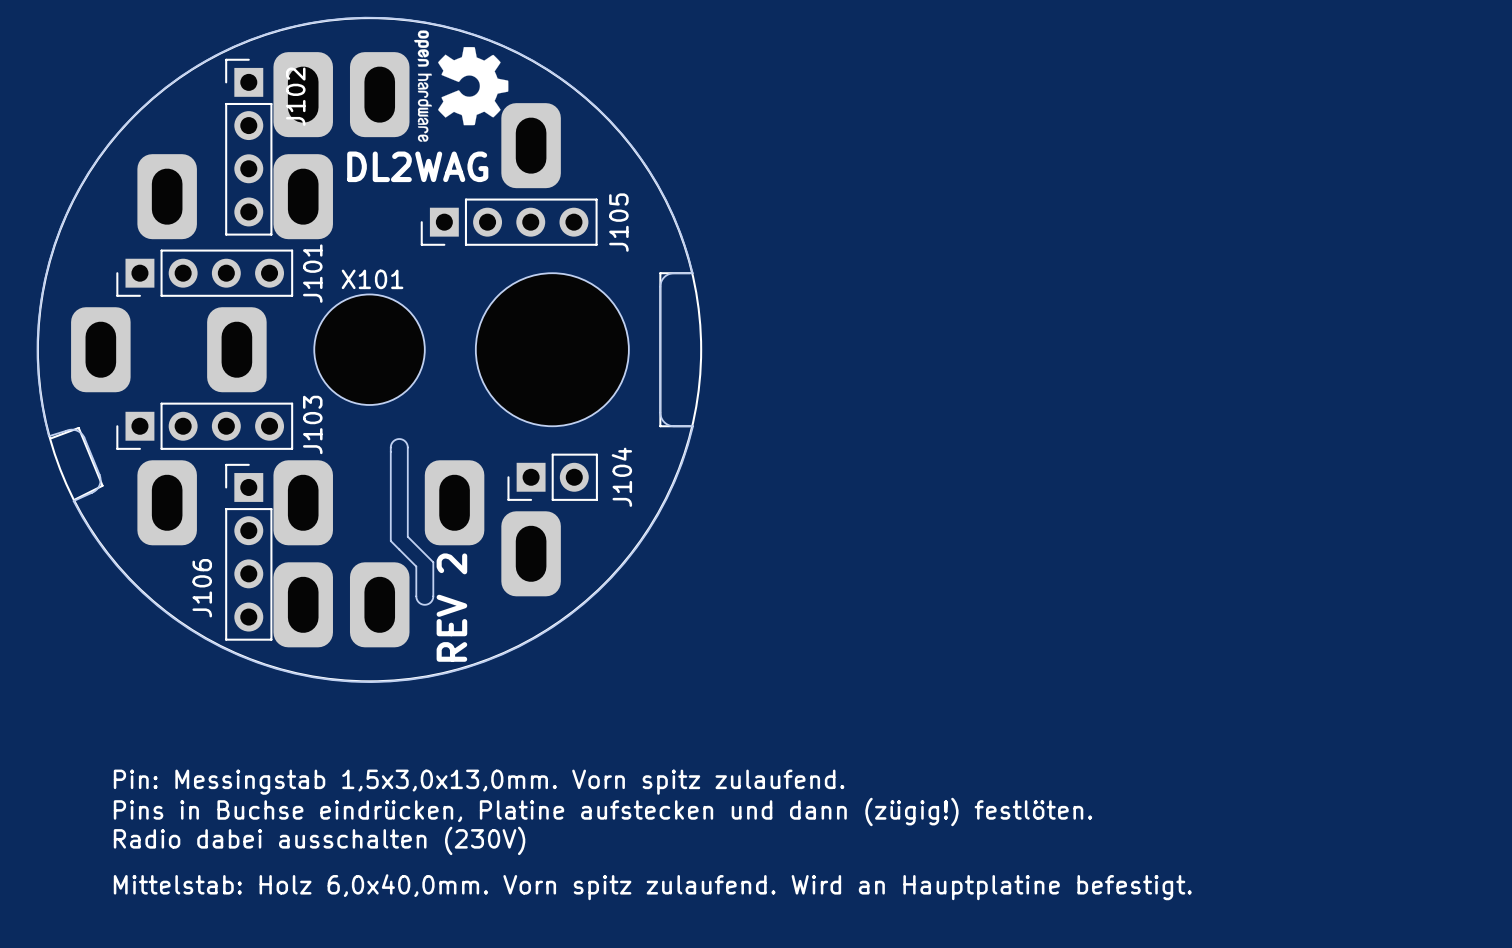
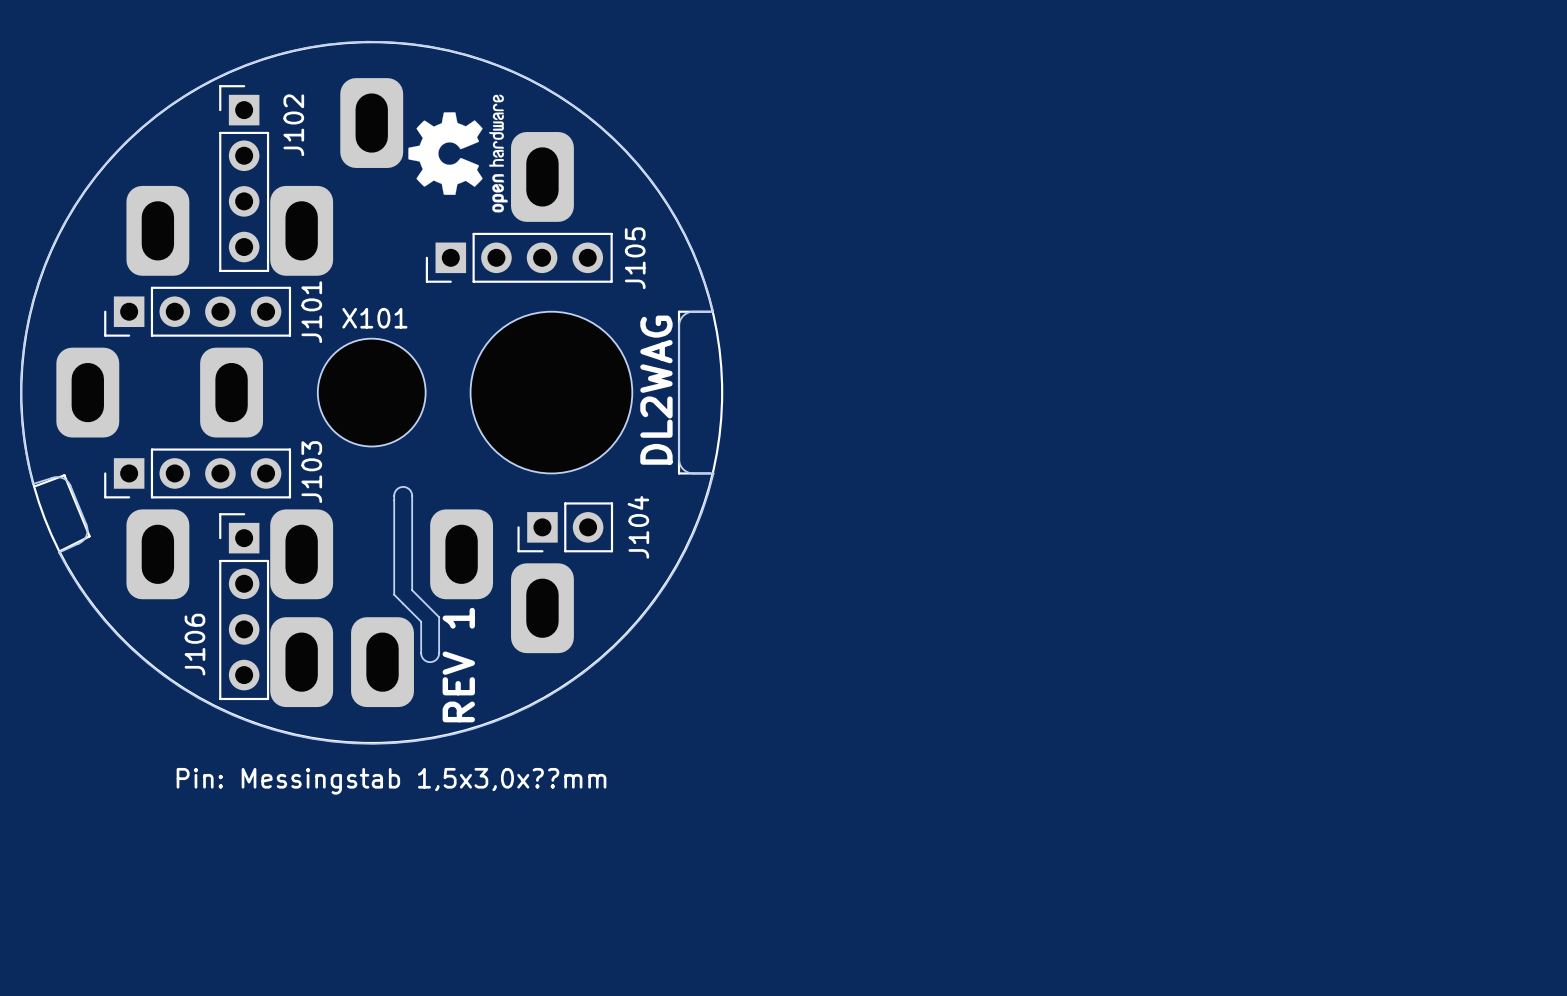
X101 footprint: [36, 17, 703, 683] -> [20, 41, 724, 745]
drawing: [414, 30, 509, 142] -> none
drawing: none -> [408, 94, 508, 213]
text rotation: 0° (417, 166) -> 90° counterclockwise (656, 390)
text position: DL2WAG (417, 166) -> DL2WAG (656, 390)
text: REV 2 (451, 607) -> REV 1 (458, 665)
drawing: [113, 797, 1192, 901] -> none

